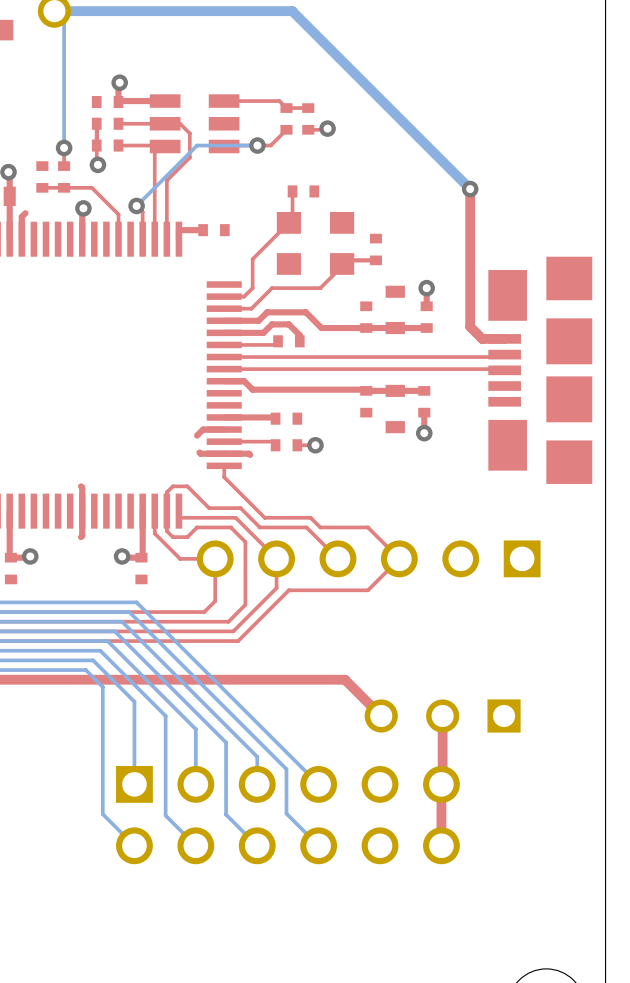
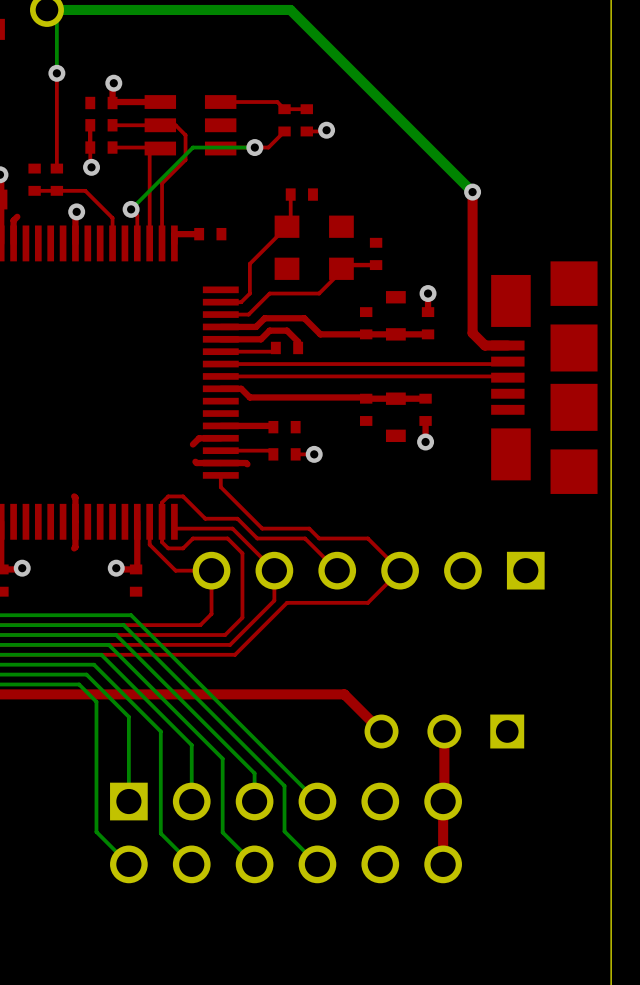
top track: none -> (56, 73) (56, 150)
bottom track: (64, 73) (64, 147) -> none
via position: (64, 147) -> (56, 73)

